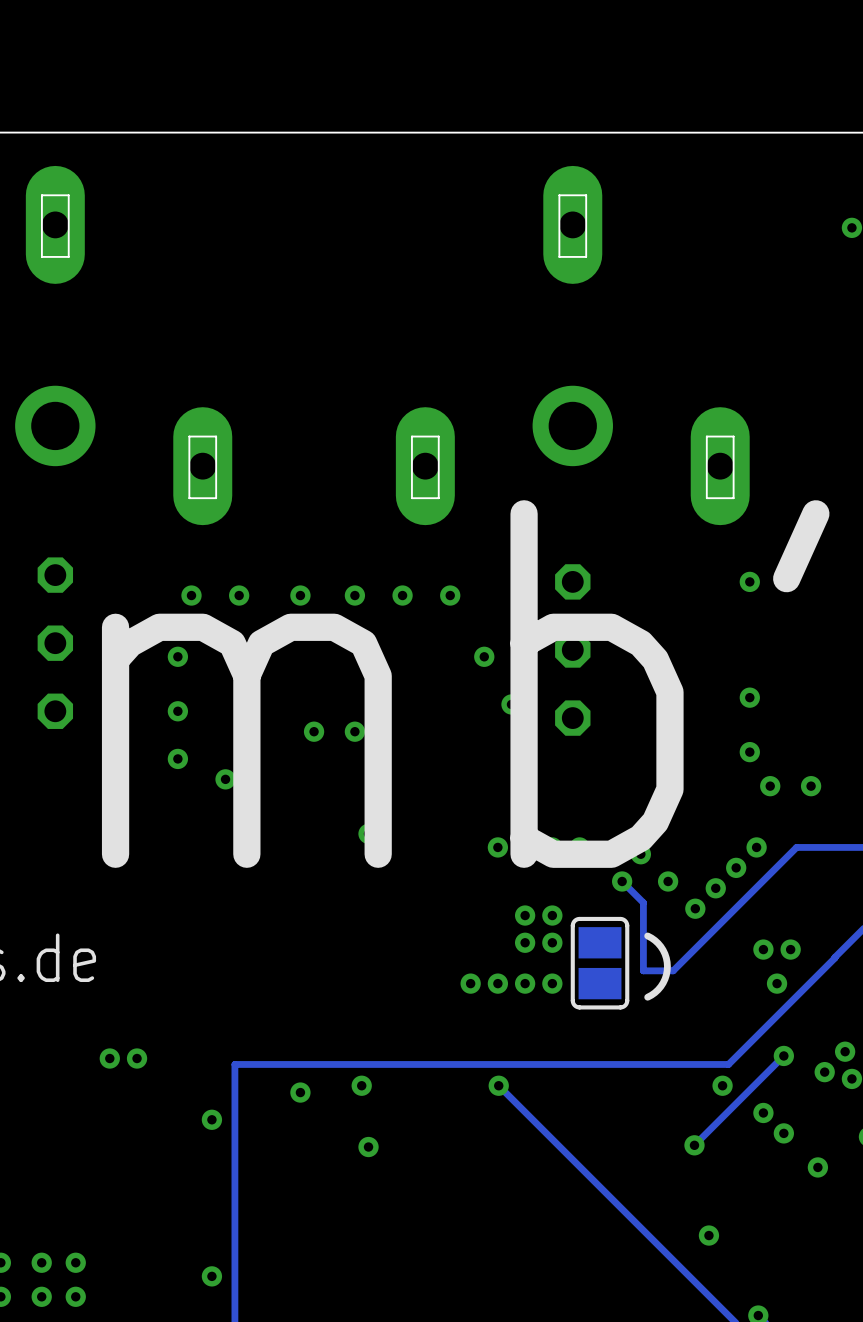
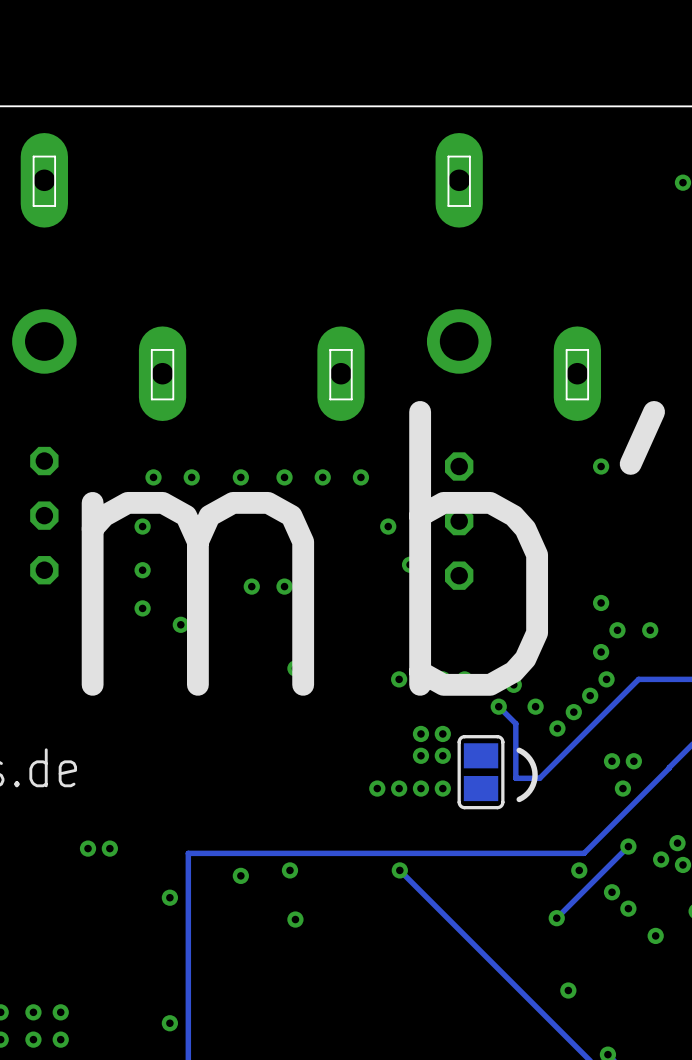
via: (749, 697) -> none
via: none -> (601, 652)

